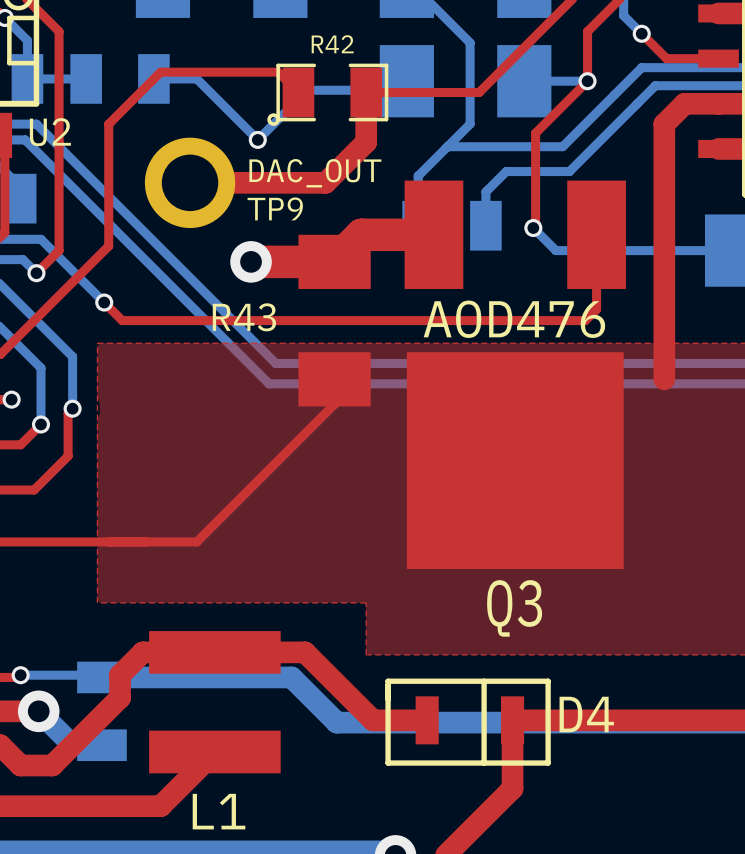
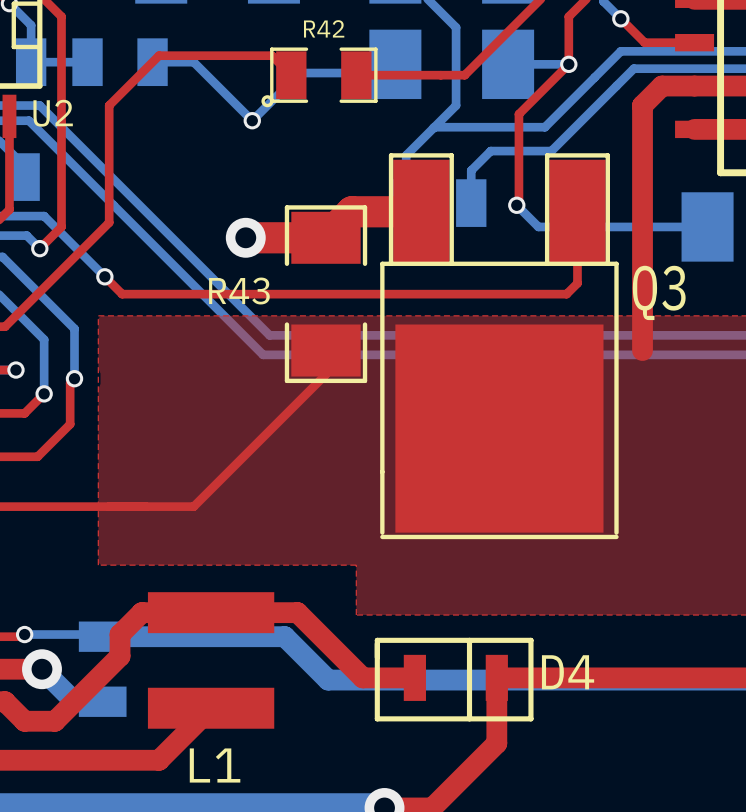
top track: (366, 92) (366, 142) (325, 182) (190, 182) -> none
Q3 footprint: [404, 180, 626, 570] -> [380, 153, 619, 540]
TP9: DAC_OUT (190, 182) -> none
R43 footprint: [298, 234, 371, 407] -> [284, 205, 368, 384]
Q3 value: AOD476 (514, 319) -> none
Q3 name position: Q3 (514, 608) -> Q3 (659, 292)

